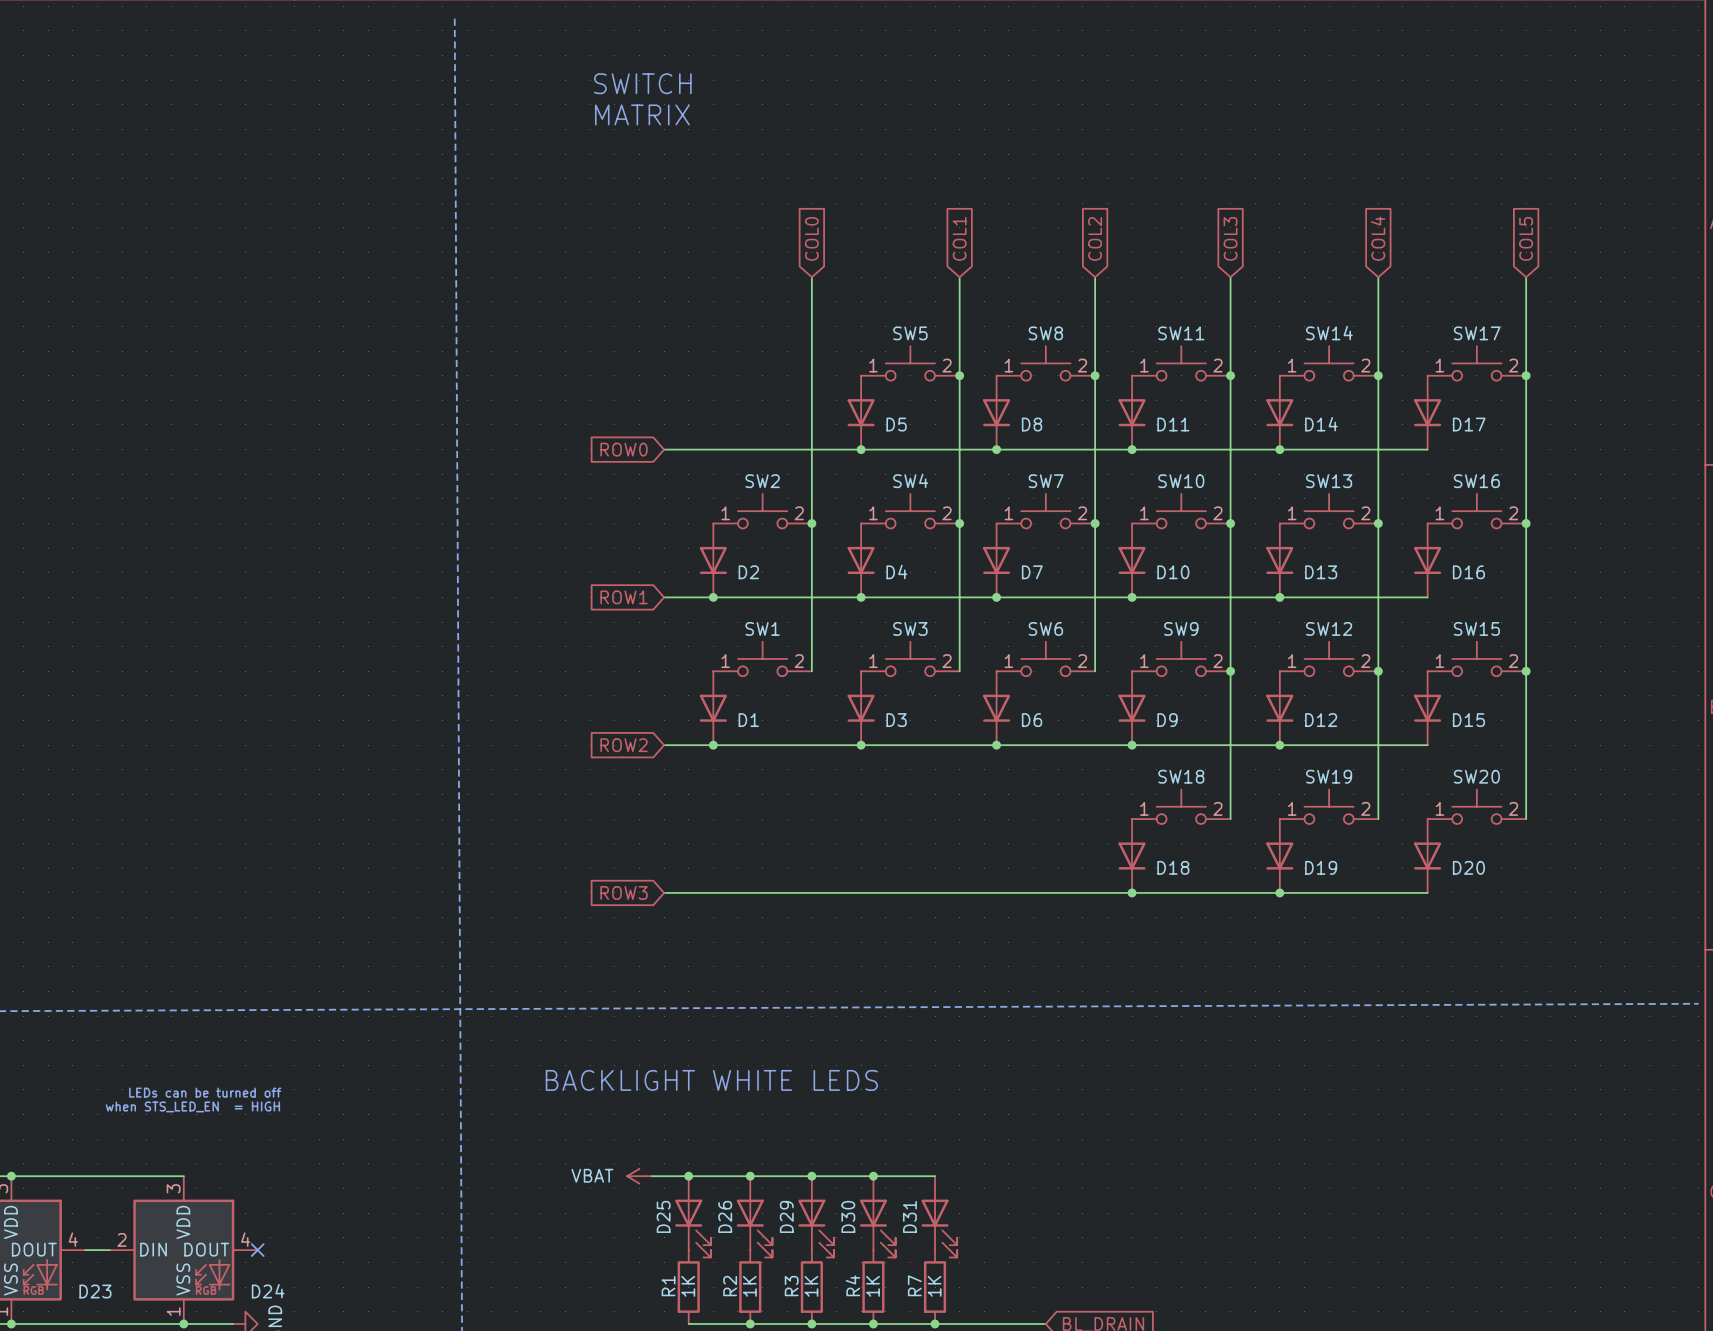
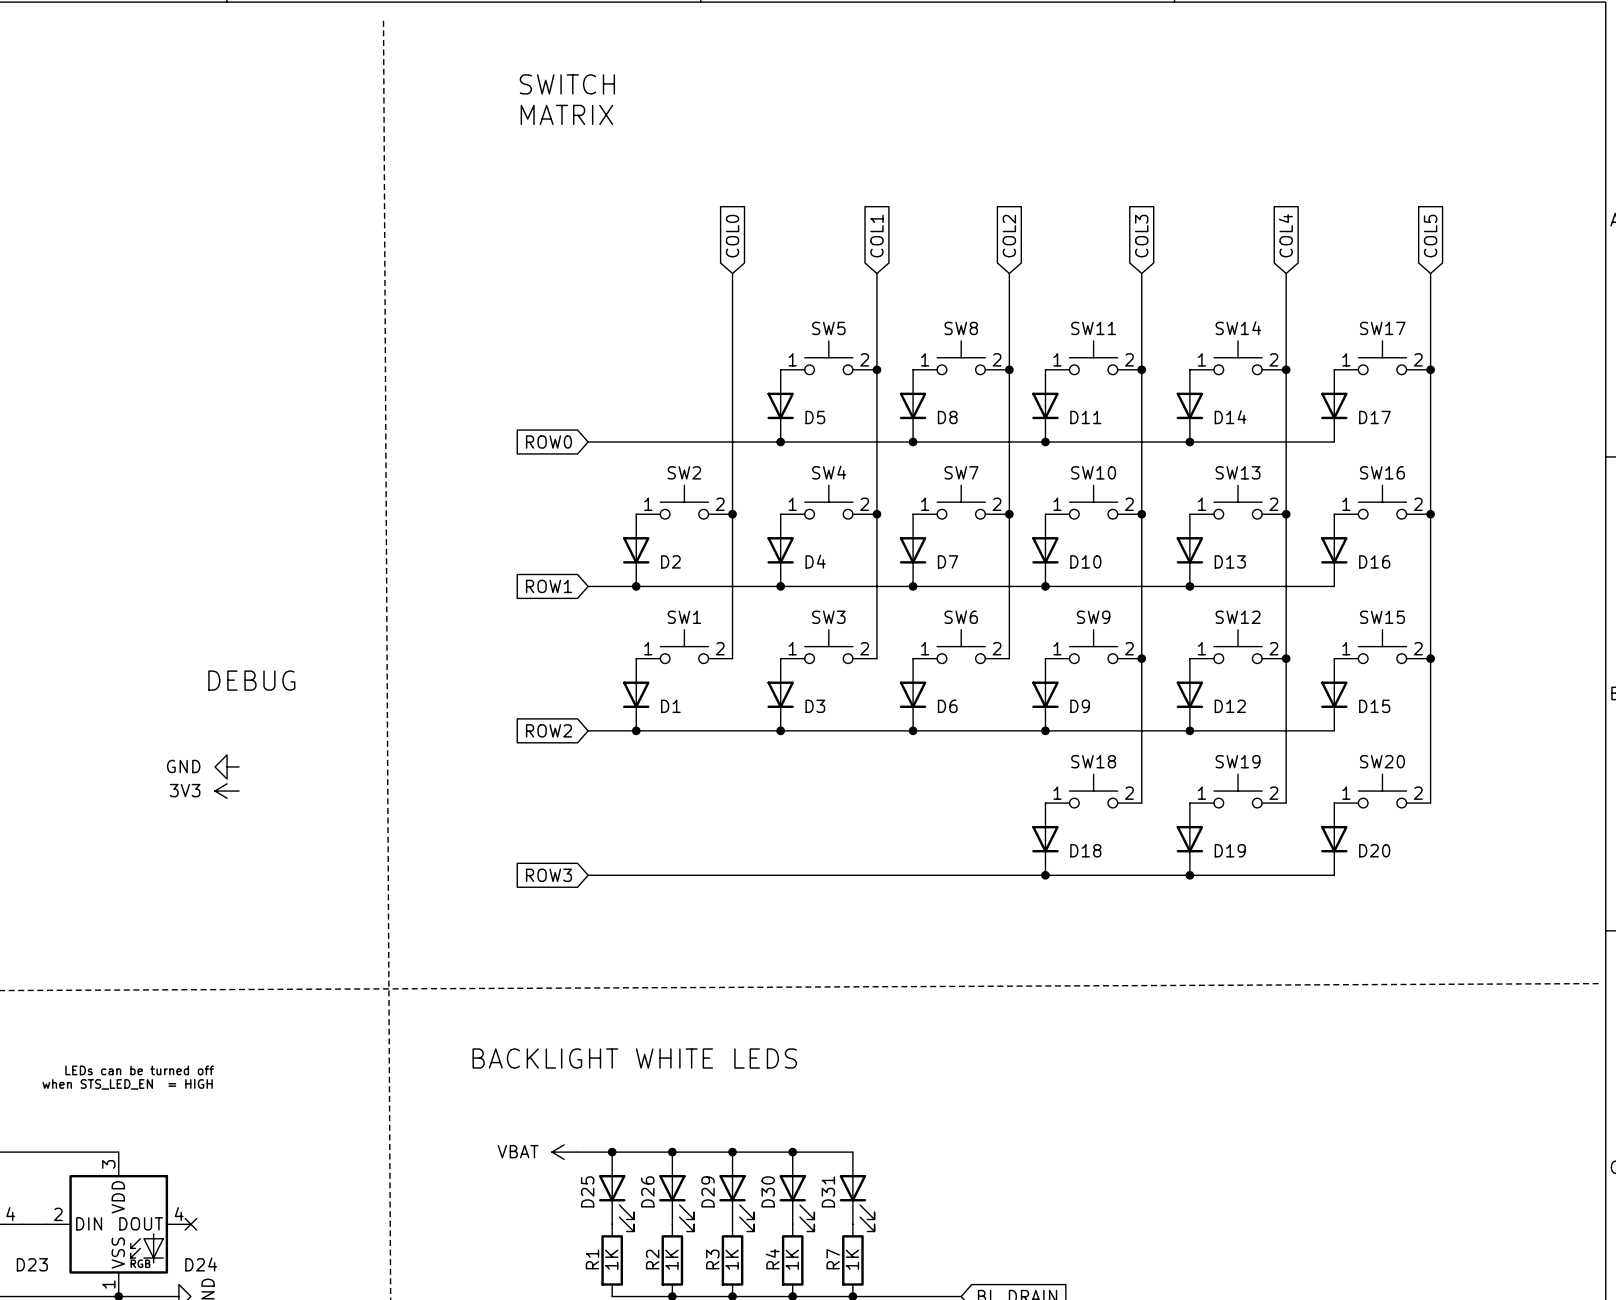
text: none -> DEBUG (251, 680)
power symbol: none -> GND (227, 766)
power symbol: none -> 3V3 (227, 791)

